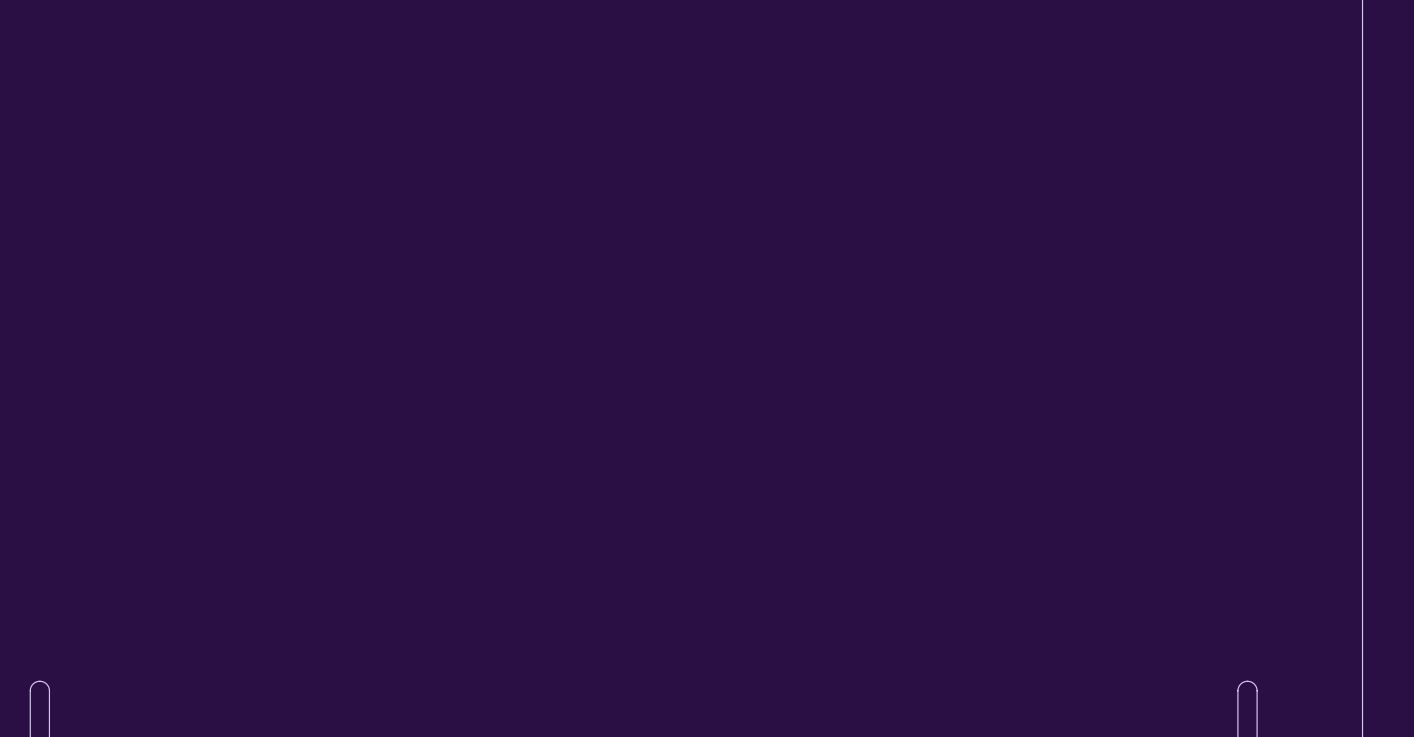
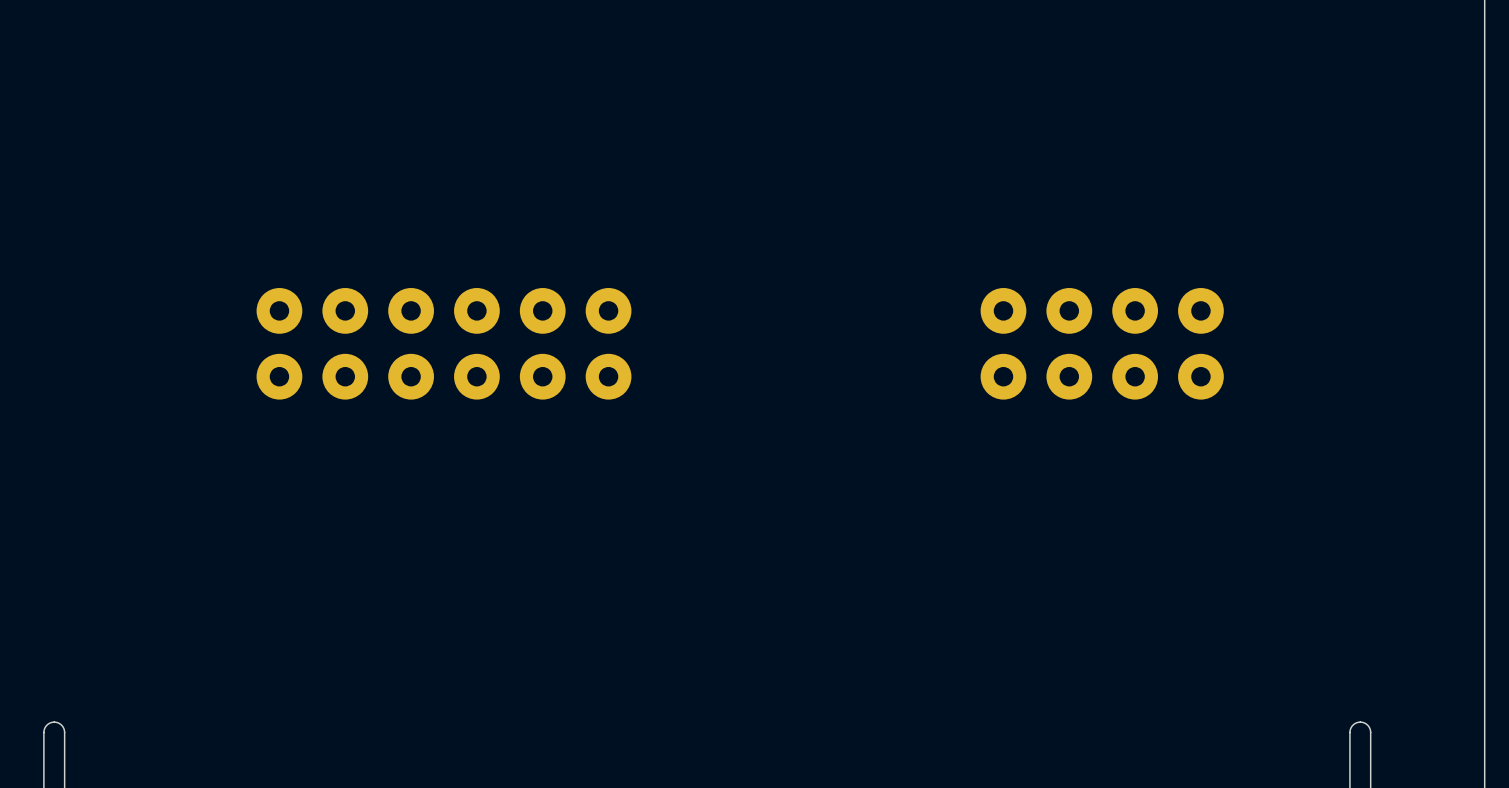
part: none -> (444, 343)
part: none -> (1102, 343)

